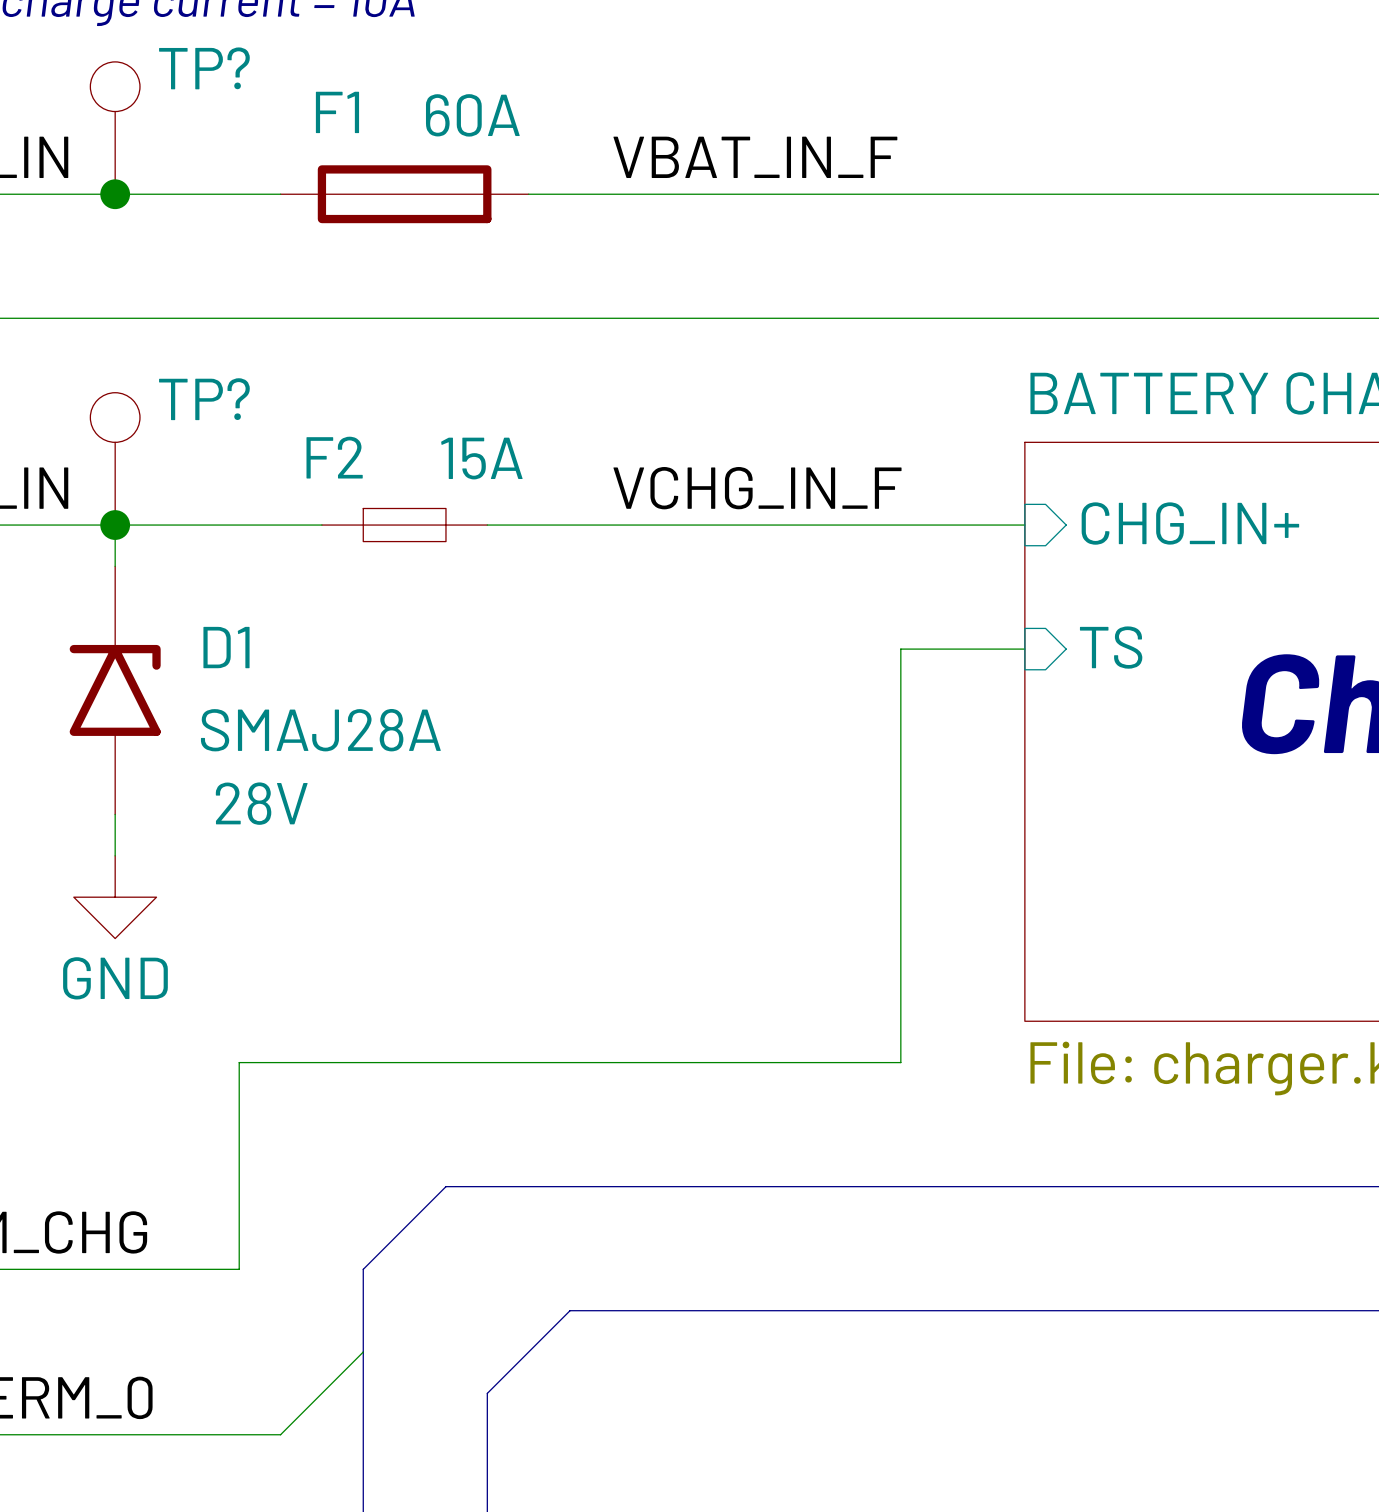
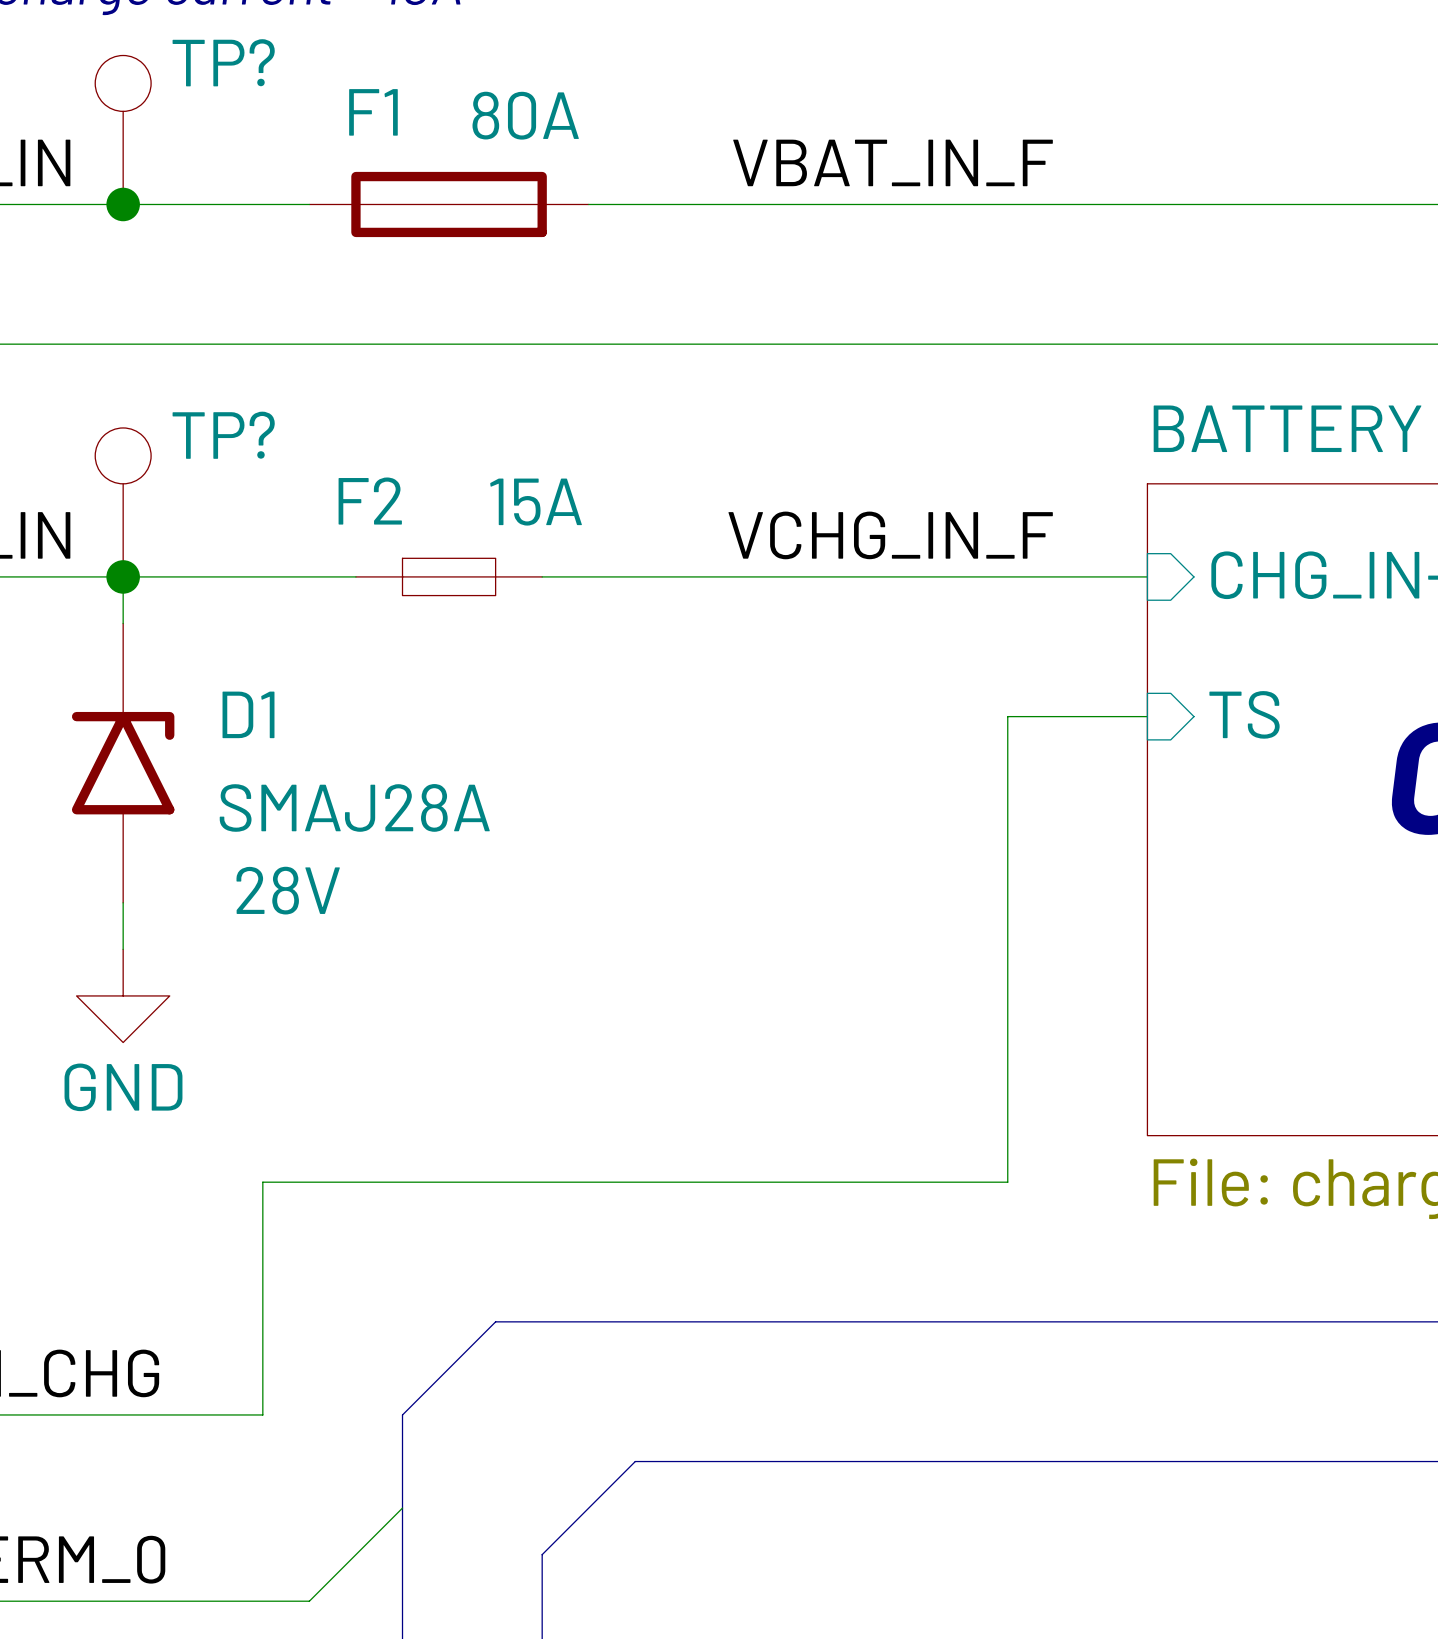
F1 value: 60A (472, 115) -> 80A (525, 115)
label position: VBAT_IN_F (755, 157) -> VBAT_IN_F (893, 162)
label position: VCHG_IN_F (757, 488) -> VCHG_IN_F (890, 535)

